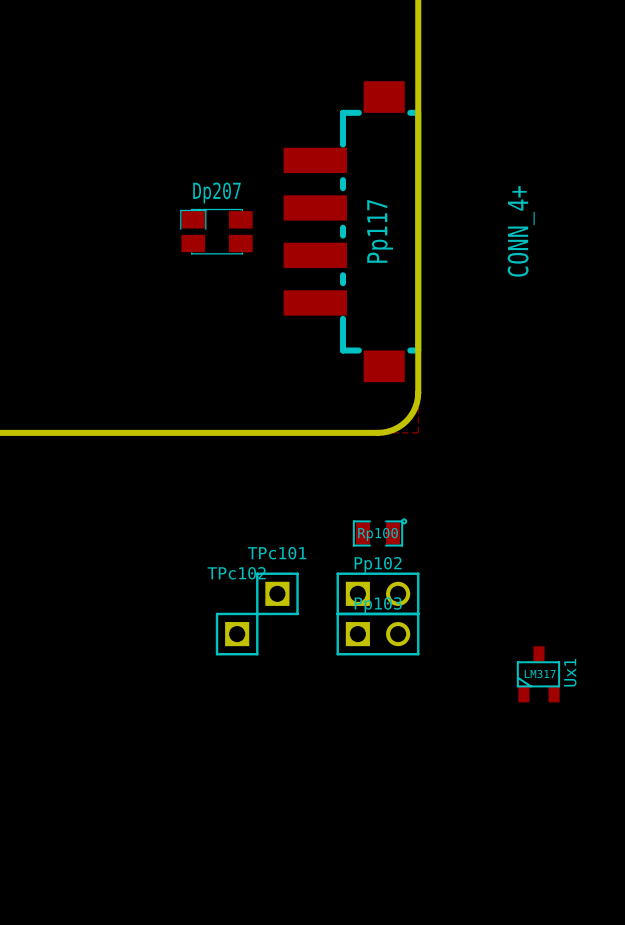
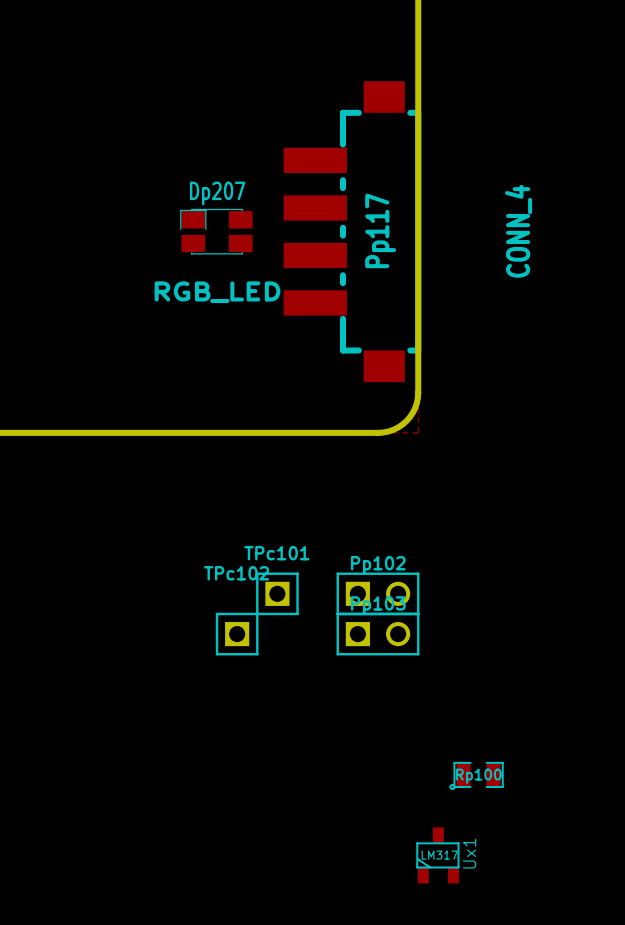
Pp117 value: CONN_4+ (521, 231) -> CONN_4 (518, 231)
Dp207 value: none -> RGB_LED (217, 292)
Rp100 rotation: 0° (380, 532) -> 180° (476, 775)
Rp100 position: (380, 532) -> (476, 775)
Ux1 position: (538, 674) -> (437, 855)

